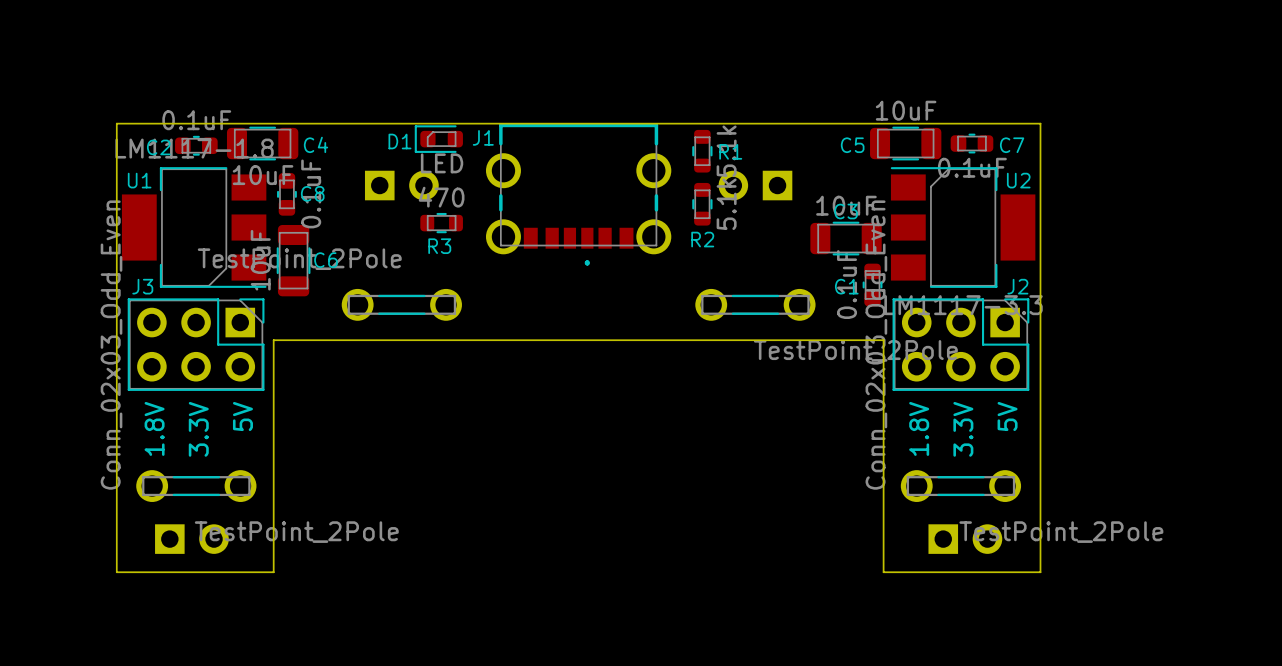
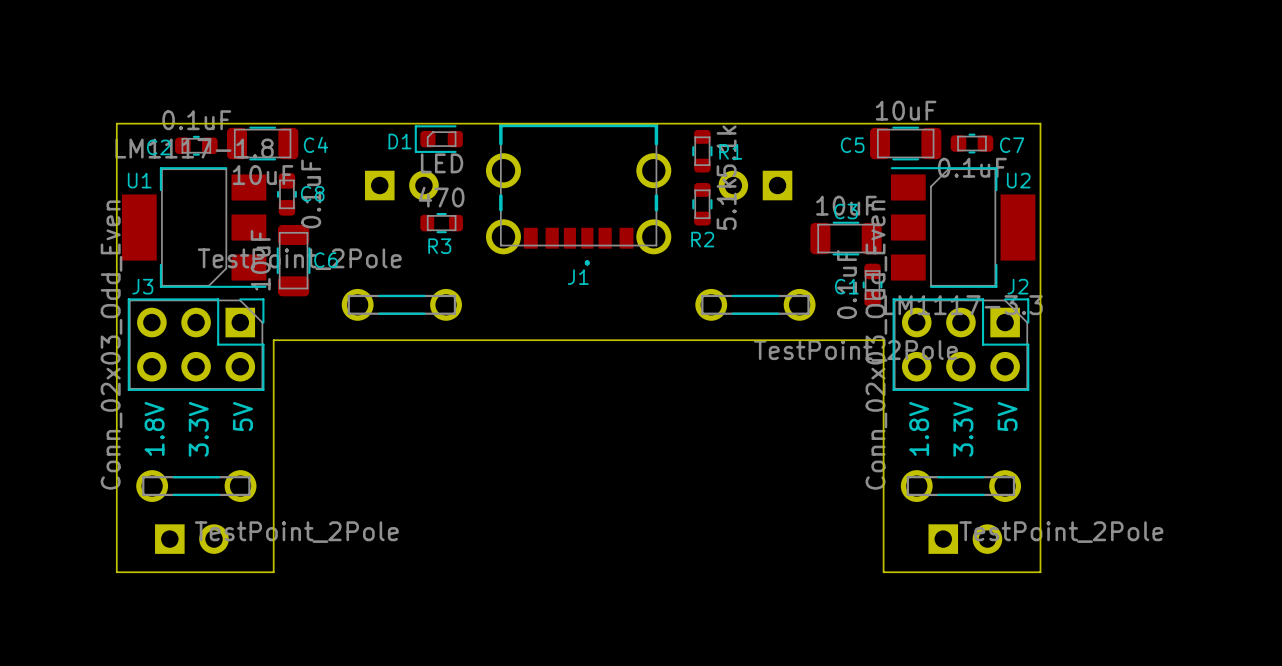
J1 name position: J1 (483, 137) -> J1 (578, 277)

